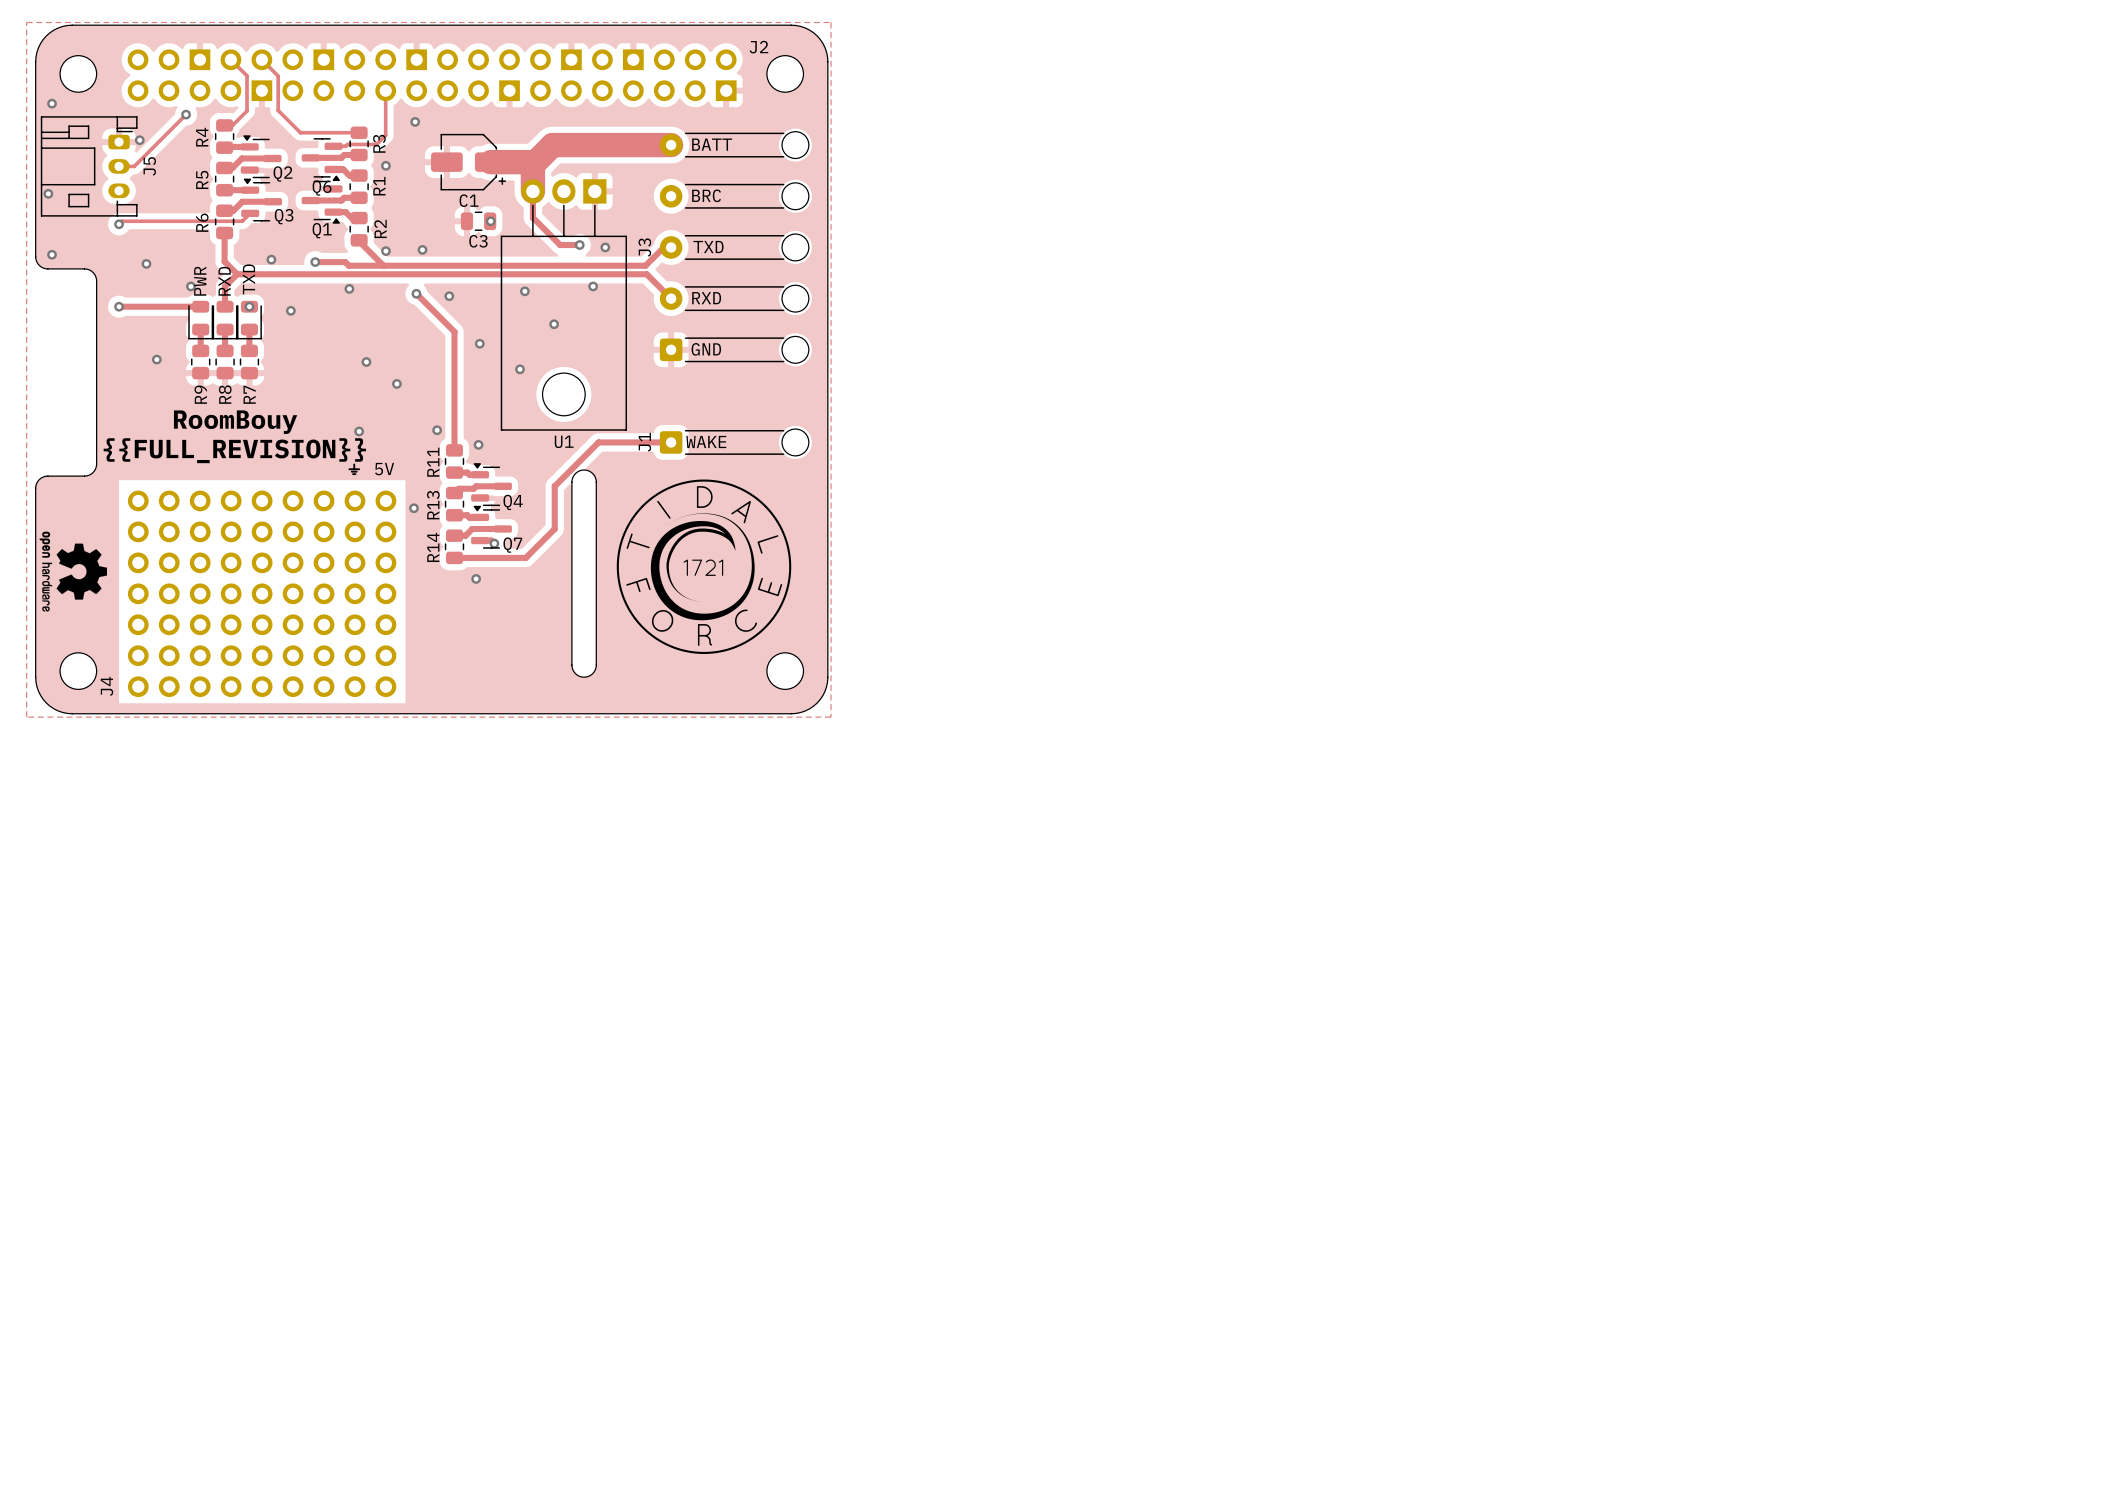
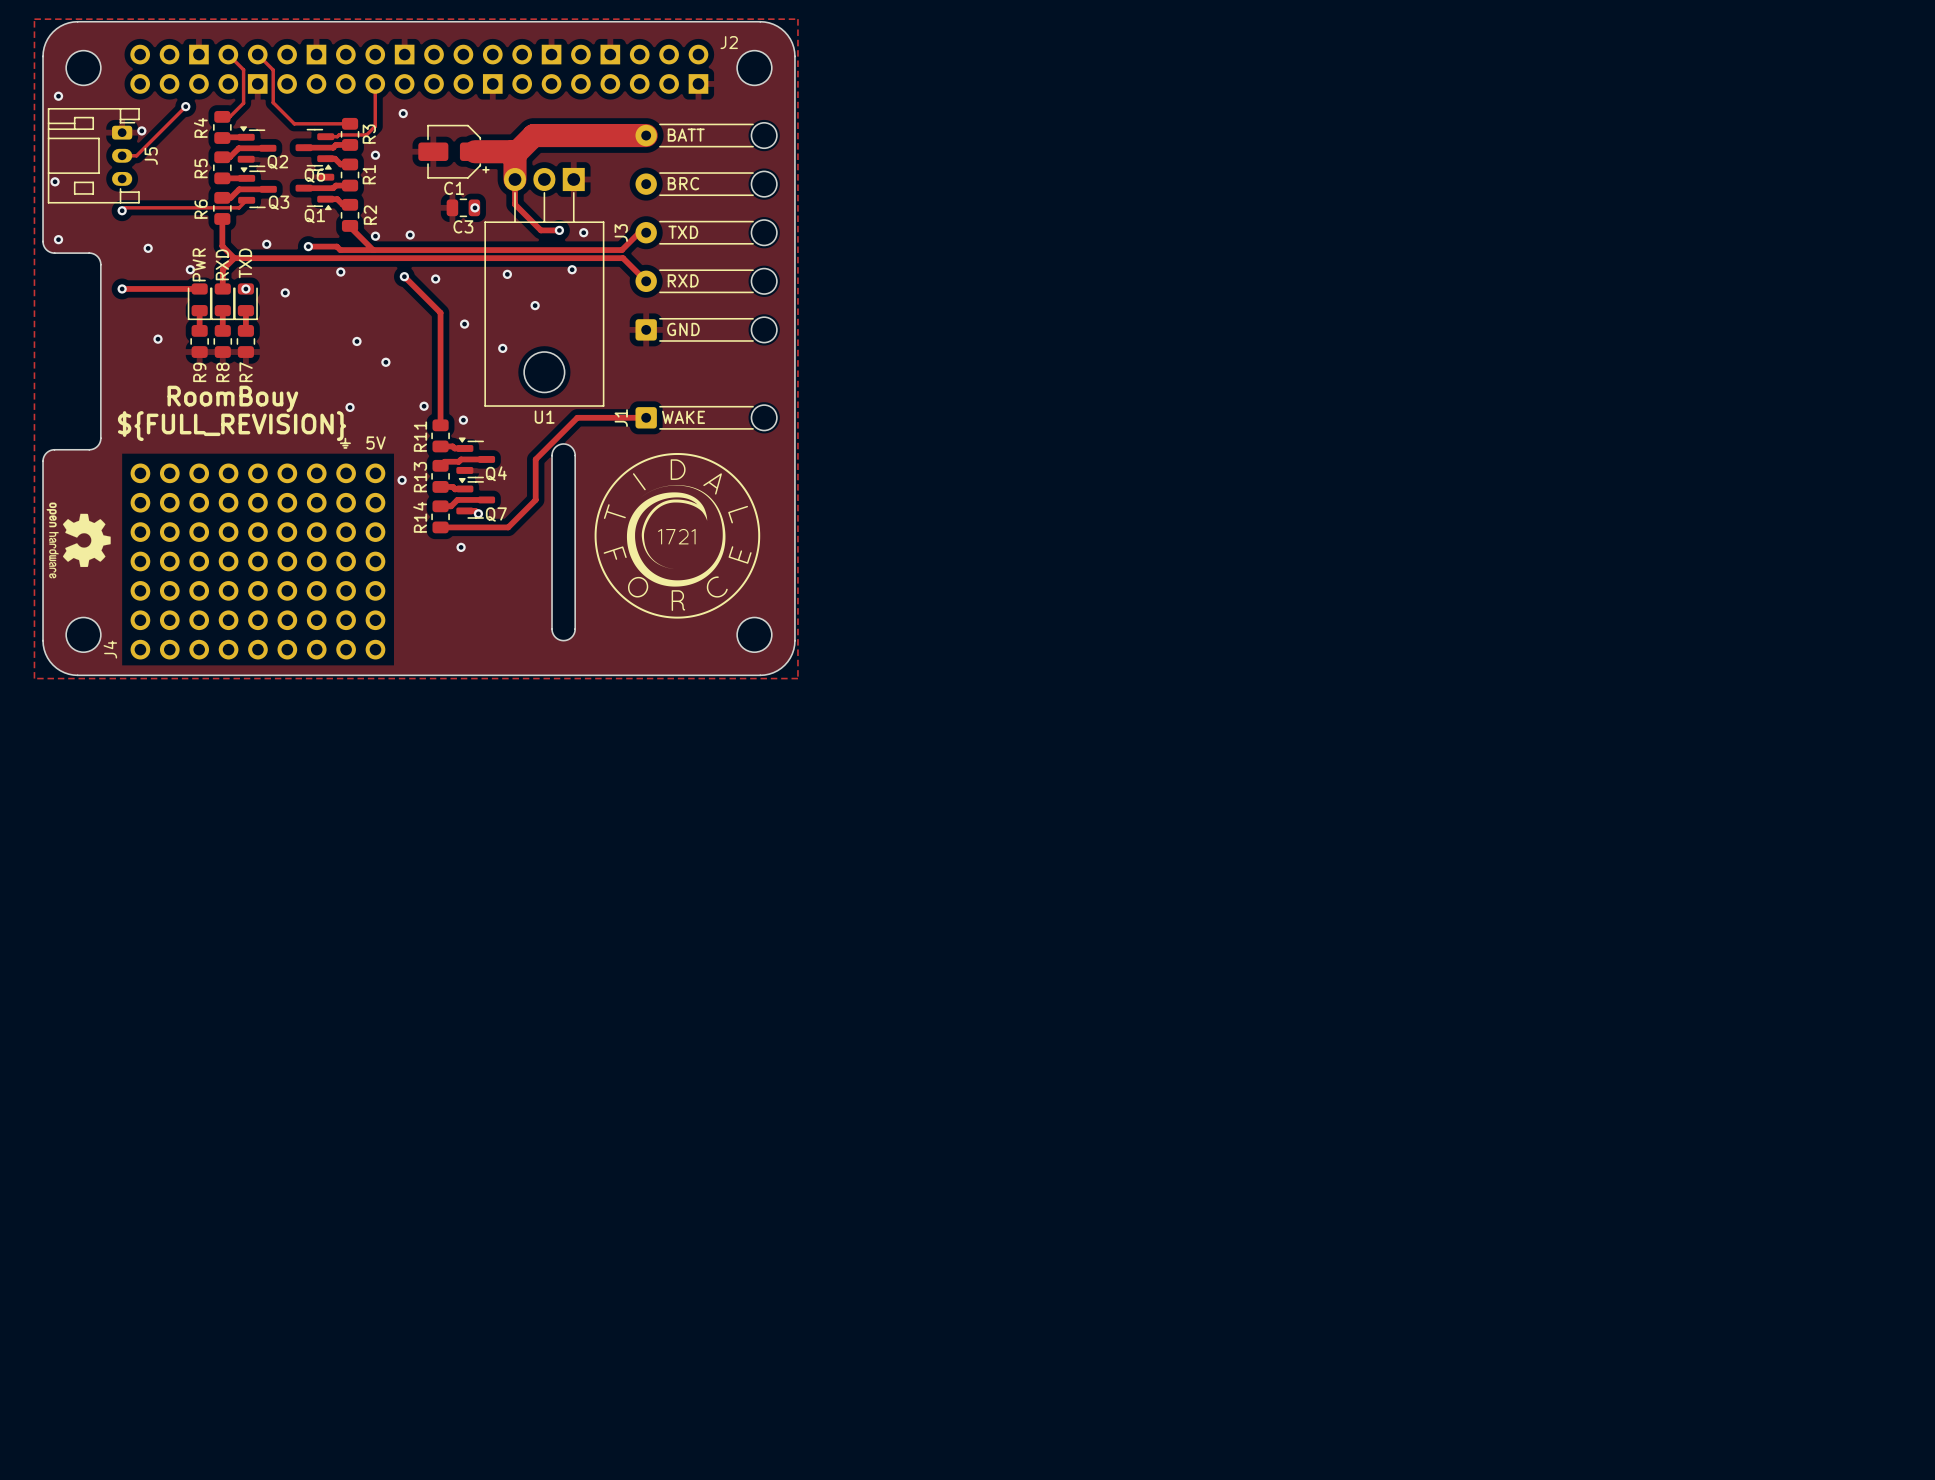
text: {{FULL_REVISION}} (234, 450) -> ${FULL_REVISION} (232, 426)

